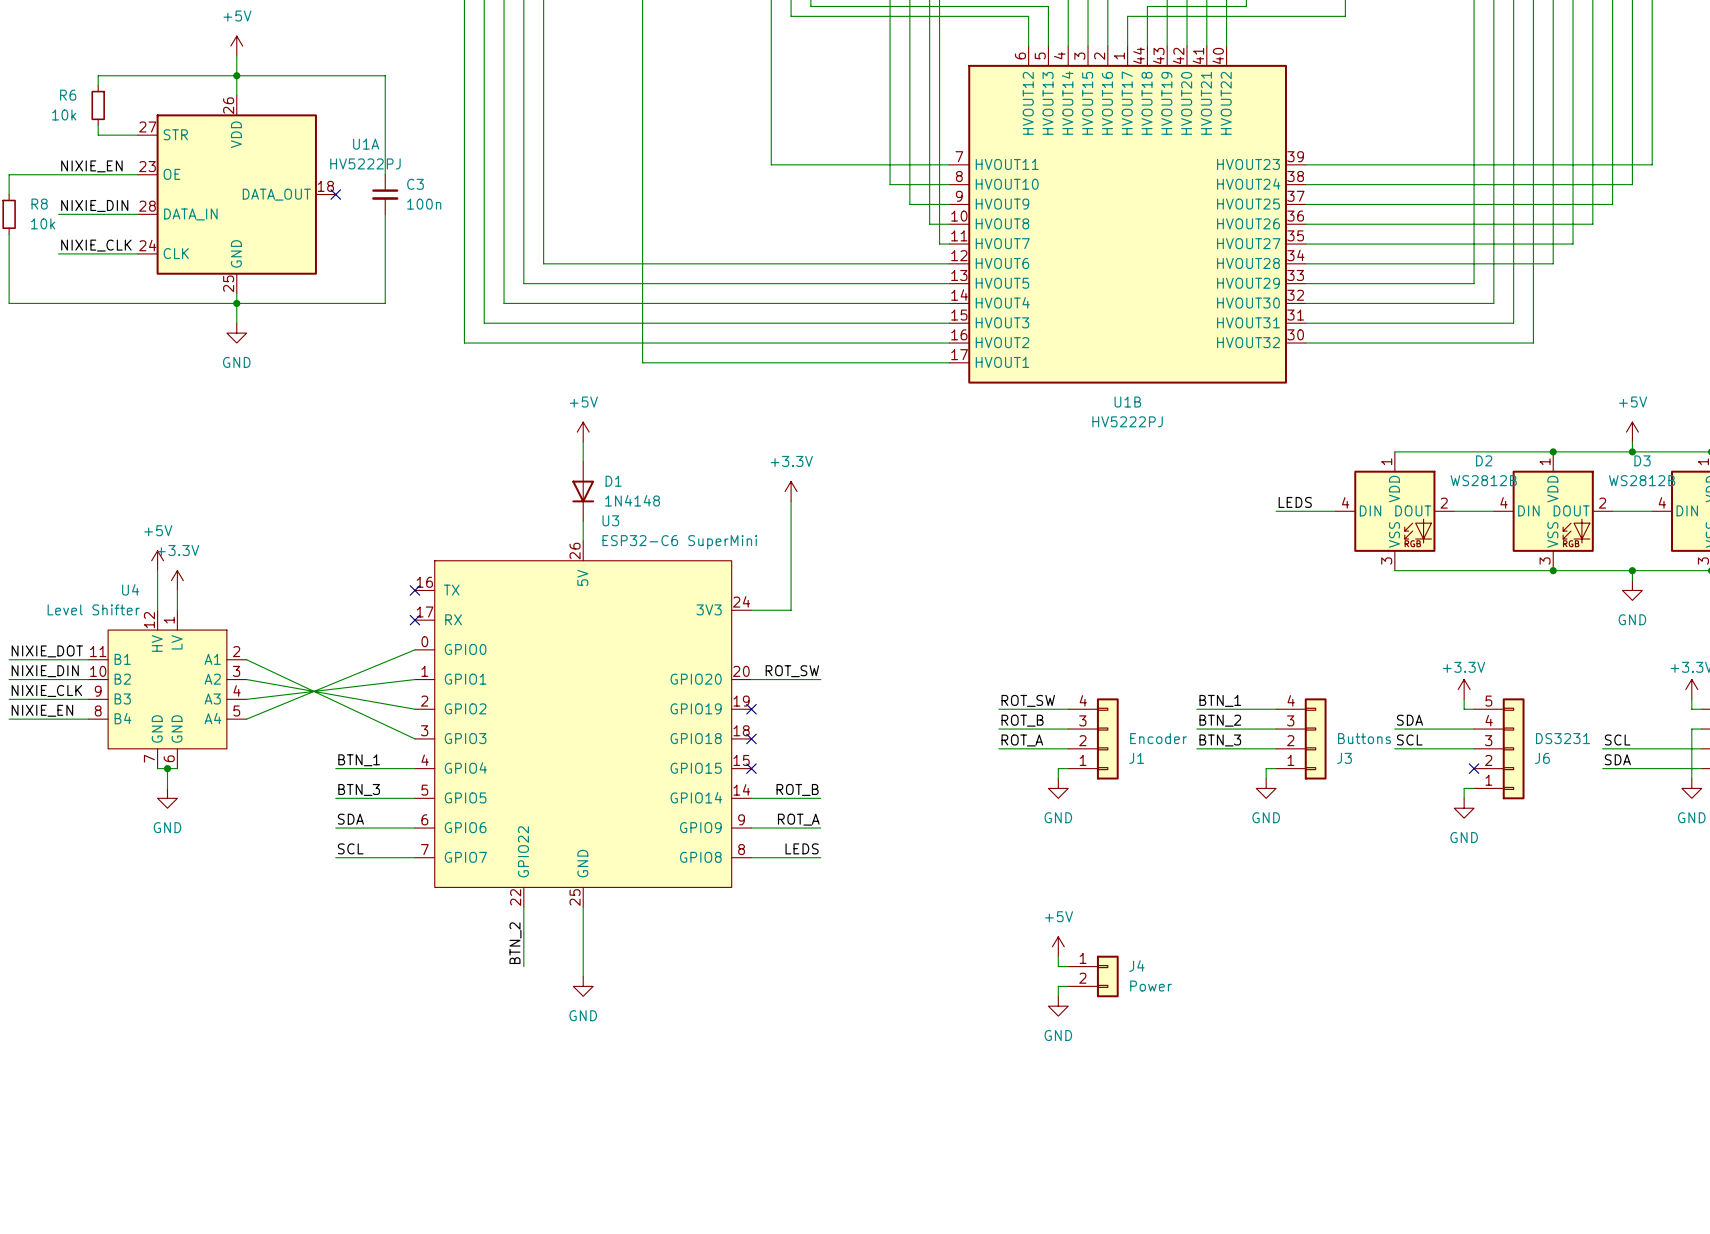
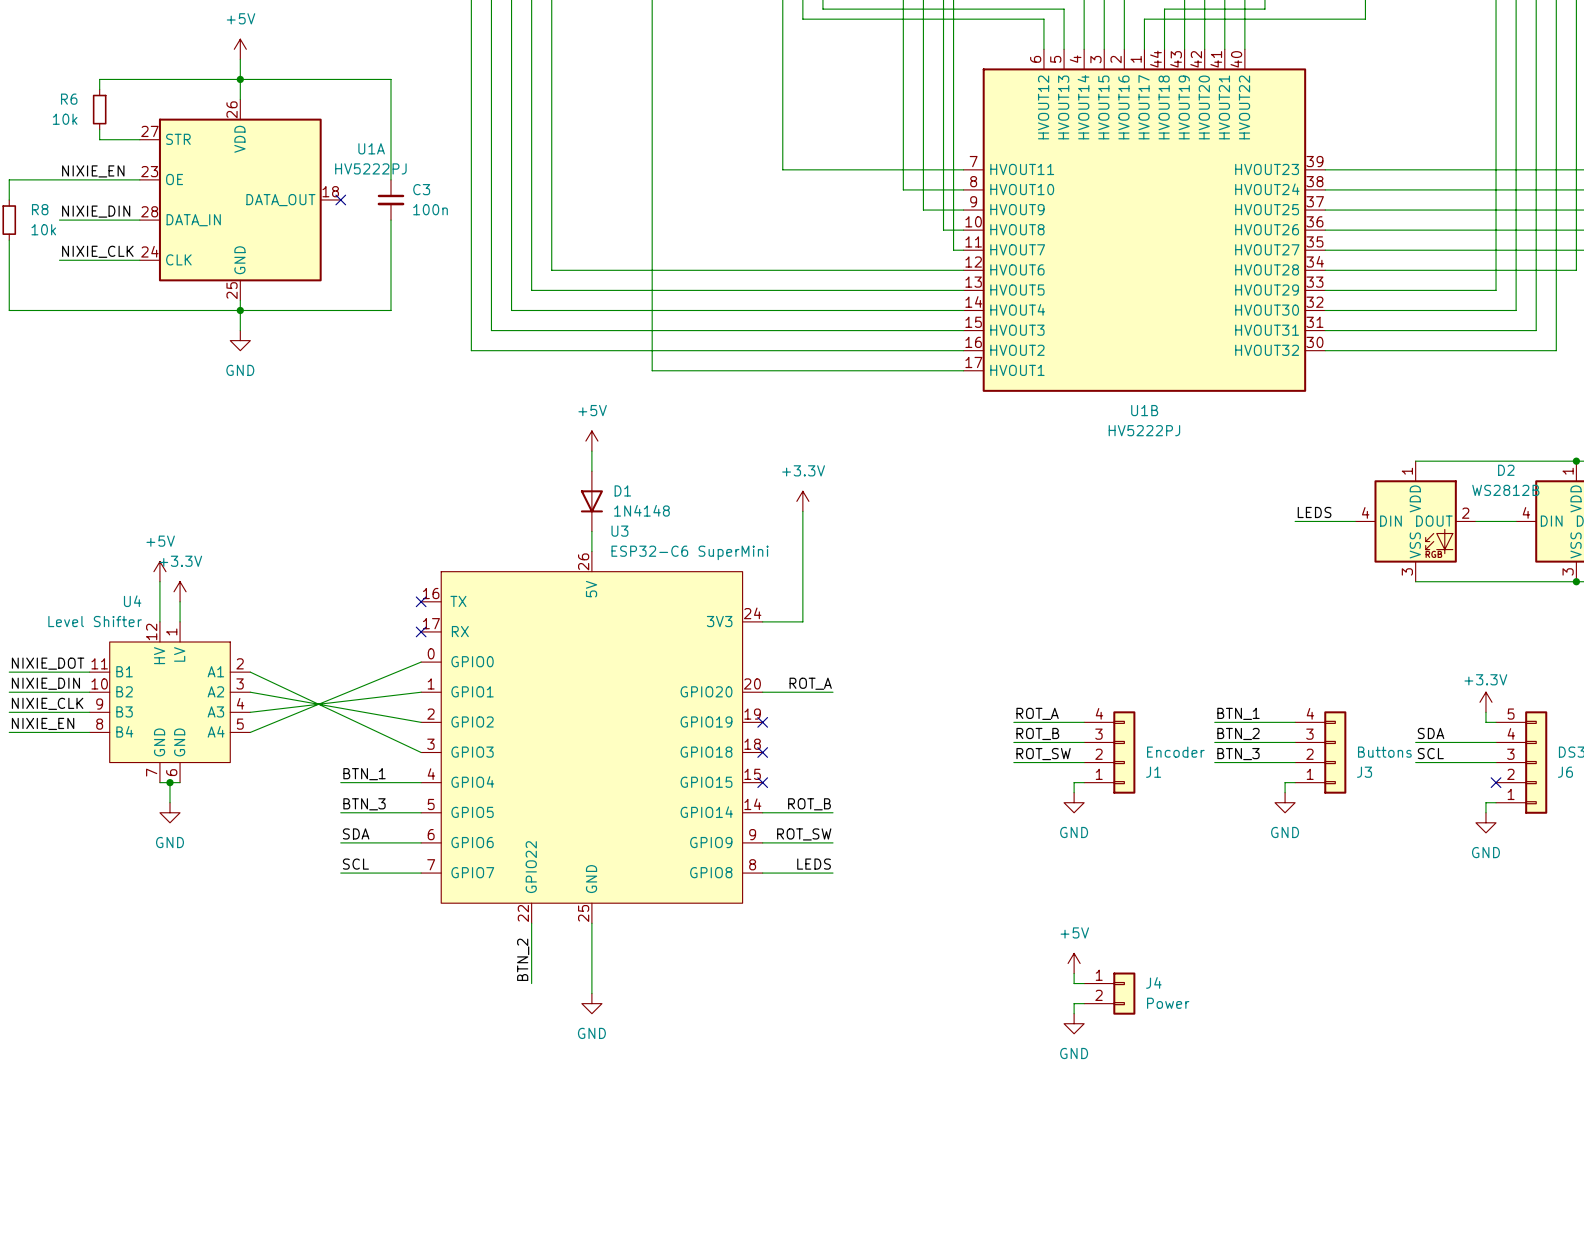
label: ROT_SW (792, 671) -> ROT_A (810, 683)
label: ROT_SW (1028, 700) -> ROT_A (1037, 713)
label: ROT_A (1022, 740) -> ROT_SW (1043, 754)
label: ROT_A (798, 819) -> ROT_SW (804, 834)

